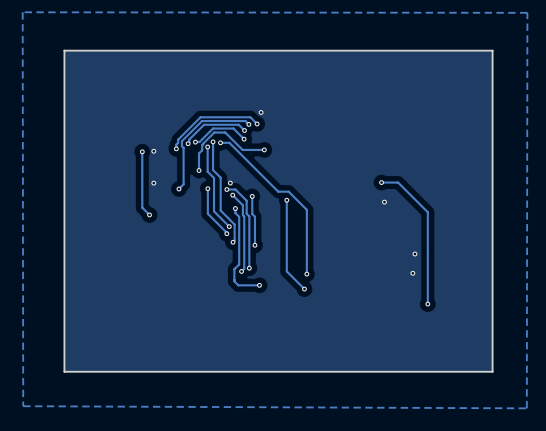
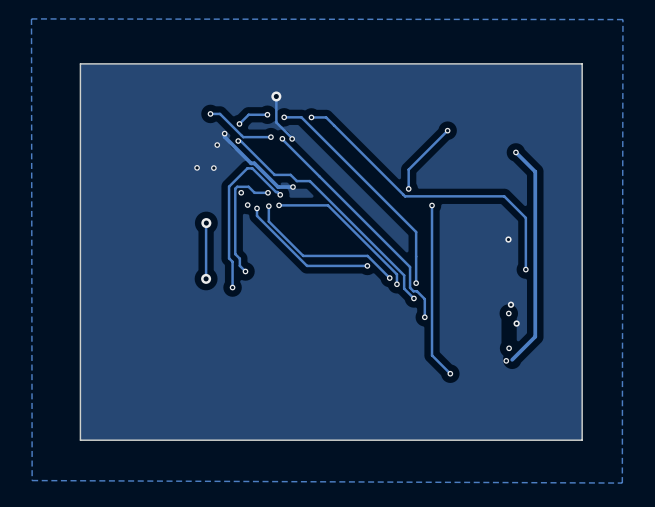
track: none -> (276, 96) (276, 122) (292, 138)
via: none -> (276, 96)
track: none -> (210, 113) (220, 113) (243, 137) (270, 137)
via: none -> (210, 113)
track: none -> (267, 114) (248, 114) (239, 123)
via: none -> (267, 114)
track: none -> (284, 117) (301, 117) (416, 232) (416, 283)
via: none -> (284, 117)
track: none -> (311, 117) (326, 117) (405, 196) (504, 196) (525, 217) (525, 269)
via: none -> (311, 117)
via: none -> (239, 123)
track: none -> (447, 130) (408, 169) (408, 188)
via: none -> (447, 130)
track: none -> (224, 133) (224, 136) (251, 163) (254, 163) (278, 187) (293, 187)
via: none -> (224, 133)
via: (261, 112) -> none
via: none -> (270, 137)
track: none -> (282, 138) (410, 267) (410, 287) (424, 299) (424, 317)
via: none -> (282, 138)
via: none -> (292, 138)
track: none -> (238, 141) (240, 141) (274, 174) (290, 174) (296, 181) (309, 181) (404, 275) (404, 288) (413, 298)
via: none -> (238, 141)
via: none -> (217, 145)
track: (257, 123) (250, 117) (200, 117) (178, 139) (176, 148) -> none
via: (257, 123) -> none
track: (248, 124) (245, 121) (202, 121) (181, 141) (183, 184) (178, 188) -> none
via: (248, 124) -> none
track: none -> (515, 152) (535, 171) (535, 336) (512, 359)
via: none -> (515, 152)
track: (244, 130) (238, 124) (204, 124) (189, 139) (188, 143) -> none
via: (244, 130) -> none
via: none -> (197, 167)
via: none -> (213, 168)
track: (244, 139) (233, 128) (213, 128) (199, 141) (195, 141) -> none
via: (244, 139) -> none
track: (213, 141) (213, 170) (220, 177) (220, 210) (234, 224) (233, 242) -> none
via: (213, 141) -> none
via: (195, 142) -> none
track: (220, 142) (229, 142) (278, 191) (288, 191) (306, 209) (306, 274) -> none
via: (220, 142) -> none
via: (188, 143) -> none
track: (207, 146) (207, 171) (214, 178) (214, 211) (229, 226) -> none
via: (207, 146) -> none
via: (176, 148) -> none
track: (264, 149) (242, 149) (225, 132) (214, 132) (202, 145) (202, 150) (199, 153) (199, 170) -> none
via: (264, 149) -> none
track: (142, 151) (142, 207) (149, 214) -> none
via: (142, 151) -> none
via: (153, 151) -> none
via: none -> (293, 187)
via: none -> (408, 188)
via: none -> (241, 192)
track: none -> (268, 192) (254, 192) (248, 186) (237, 186) (235, 188) (235, 254) (239, 258) (239, 265) (245, 271)
via: none -> (268, 192)
track: none -> (280, 194) (252, 168) (247, 168) (229, 186) (229, 258) (232, 261) (232, 287)
via: none -> (280, 194)
via: (199, 170) -> none
via: none -> (247, 205)
track: none -> (279, 205) (327, 205) (396, 274) (396, 284)
via: none -> (279, 205)
track: none -> (432, 205) (432, 355) (450, 373)
via: none -> (432, 205)
track: none -> (268, 206) (268, 221) (303, 255) (367, 255) (389, 278)
via: none -> (268, 206)
track: none -> (257, 208) (257, 215) (307, 265) (367, 265)
via: none -> (257, 208)
track: (381, 182) (398, 182) (427, 212) (427, 304) -> none
via: (381, 182) -> none
via: (153, 183) -> none
via: (230, 183) -> none
track: none -> (206, 223) (206, 278)
via: none -> (206, 223)
via: (178, 188) -> none
track: (207, 188) (207, 213) (226, 233) -> none
via: (207, 188) -> none
track: (226, 189) (235, 189) (246, 200) (246, 213) (249, 216) (249, 268) -> none
via: (226, 189) -> none
track: (232, 195) (242, 205) (244, 216) (244, 268) (241, 271) -> none
via: (232, 195) -> none
track: (252, 196) (252, 214) (254, 216) (254, 245) -> none
via: (252, 196) -> none
track: (286, 200) (286, 271) (304, 289) -> none
via: (286, 200) -> none
via: none -> (508, 239)
via: (384, 202) -> none
track: (235, 208) (235, 213) (239, 216) (239, 264) (234, 269) (234, 281) (238, 285) (259, 285) -> none
via: (235, 208) -> none
via: (149, 214) -> none
via: none -> (367, 265)
via: (229, 226) -> none
via: none -> (525, 269)
via: none -> (245, 271)
via: (226, 233) -> none
via: none -> (389, 278)
via: none -> (206, 278)
via: none -> (416, 283)
via: none -> (396, 284)
via: none -> (232, 287)
via: (233, 242) -> none
via: (254, 245) -> none
via: none -> (413, 298)
via: (414, 254) -> none
via: none -> (510, 304)
via: none -> (508, 313)
via: none -> (424, 317)
via: (249, 268) -> none
via: (241, 271) -> none
via: none -> (516, 323)
via: (412, 273) -> none
via: (306, 274) -> none
via: (259, 285) -> none
via: (304, 289) -> none
via: none -> (509, 348)
via: none -> (450, 373)

